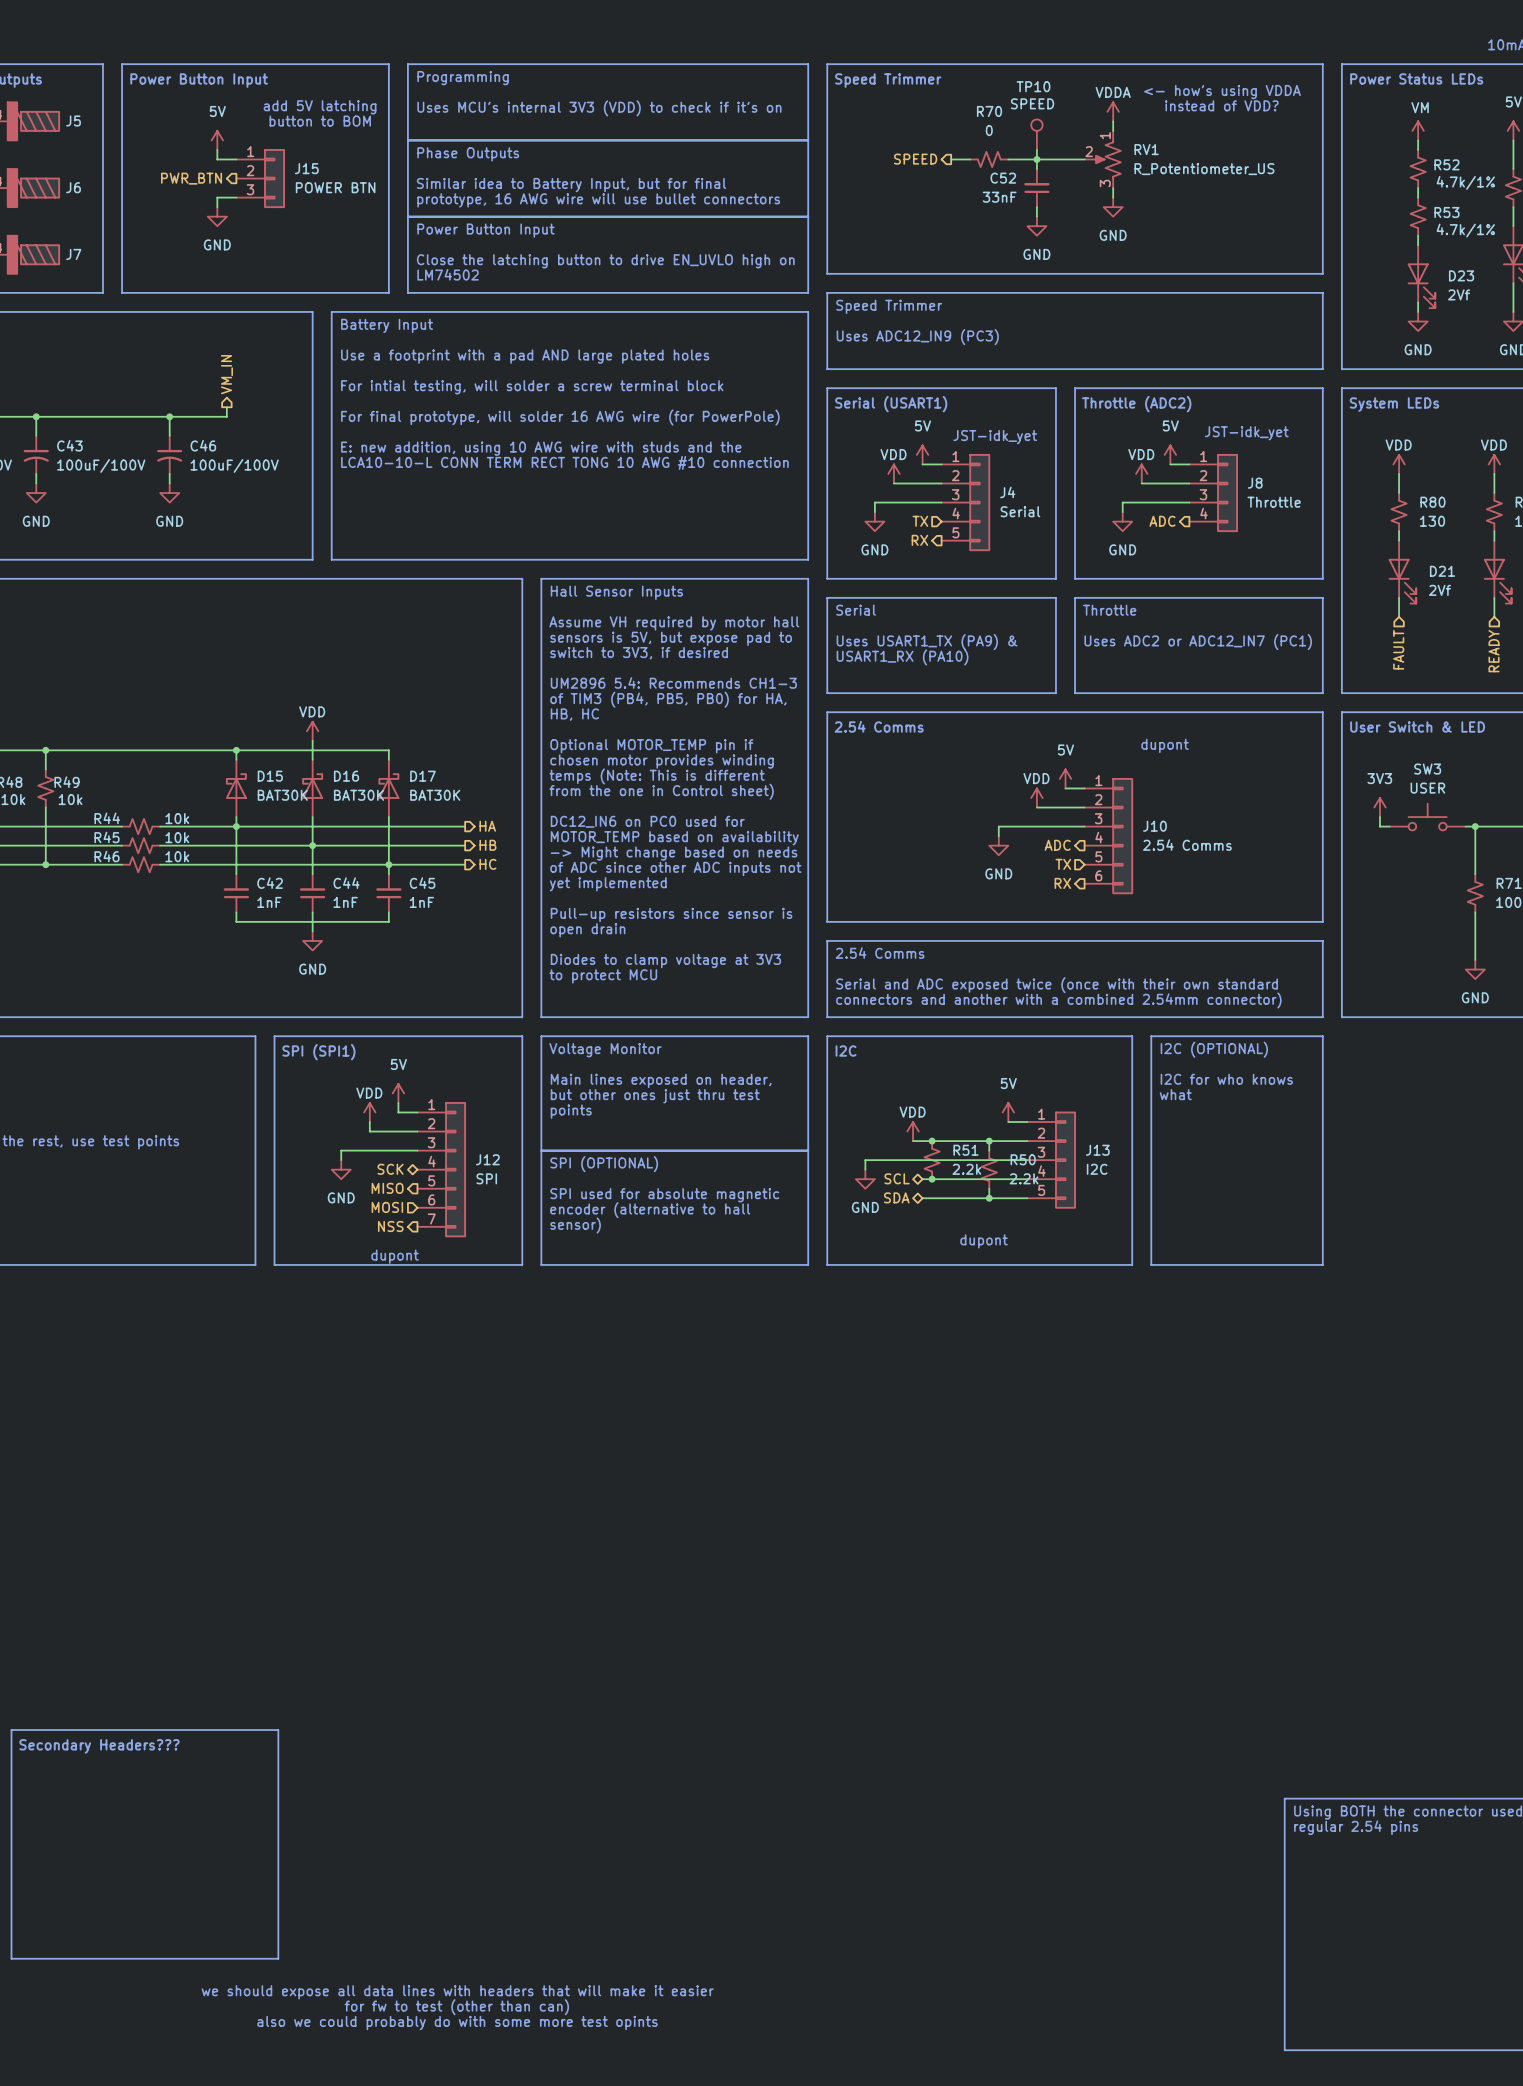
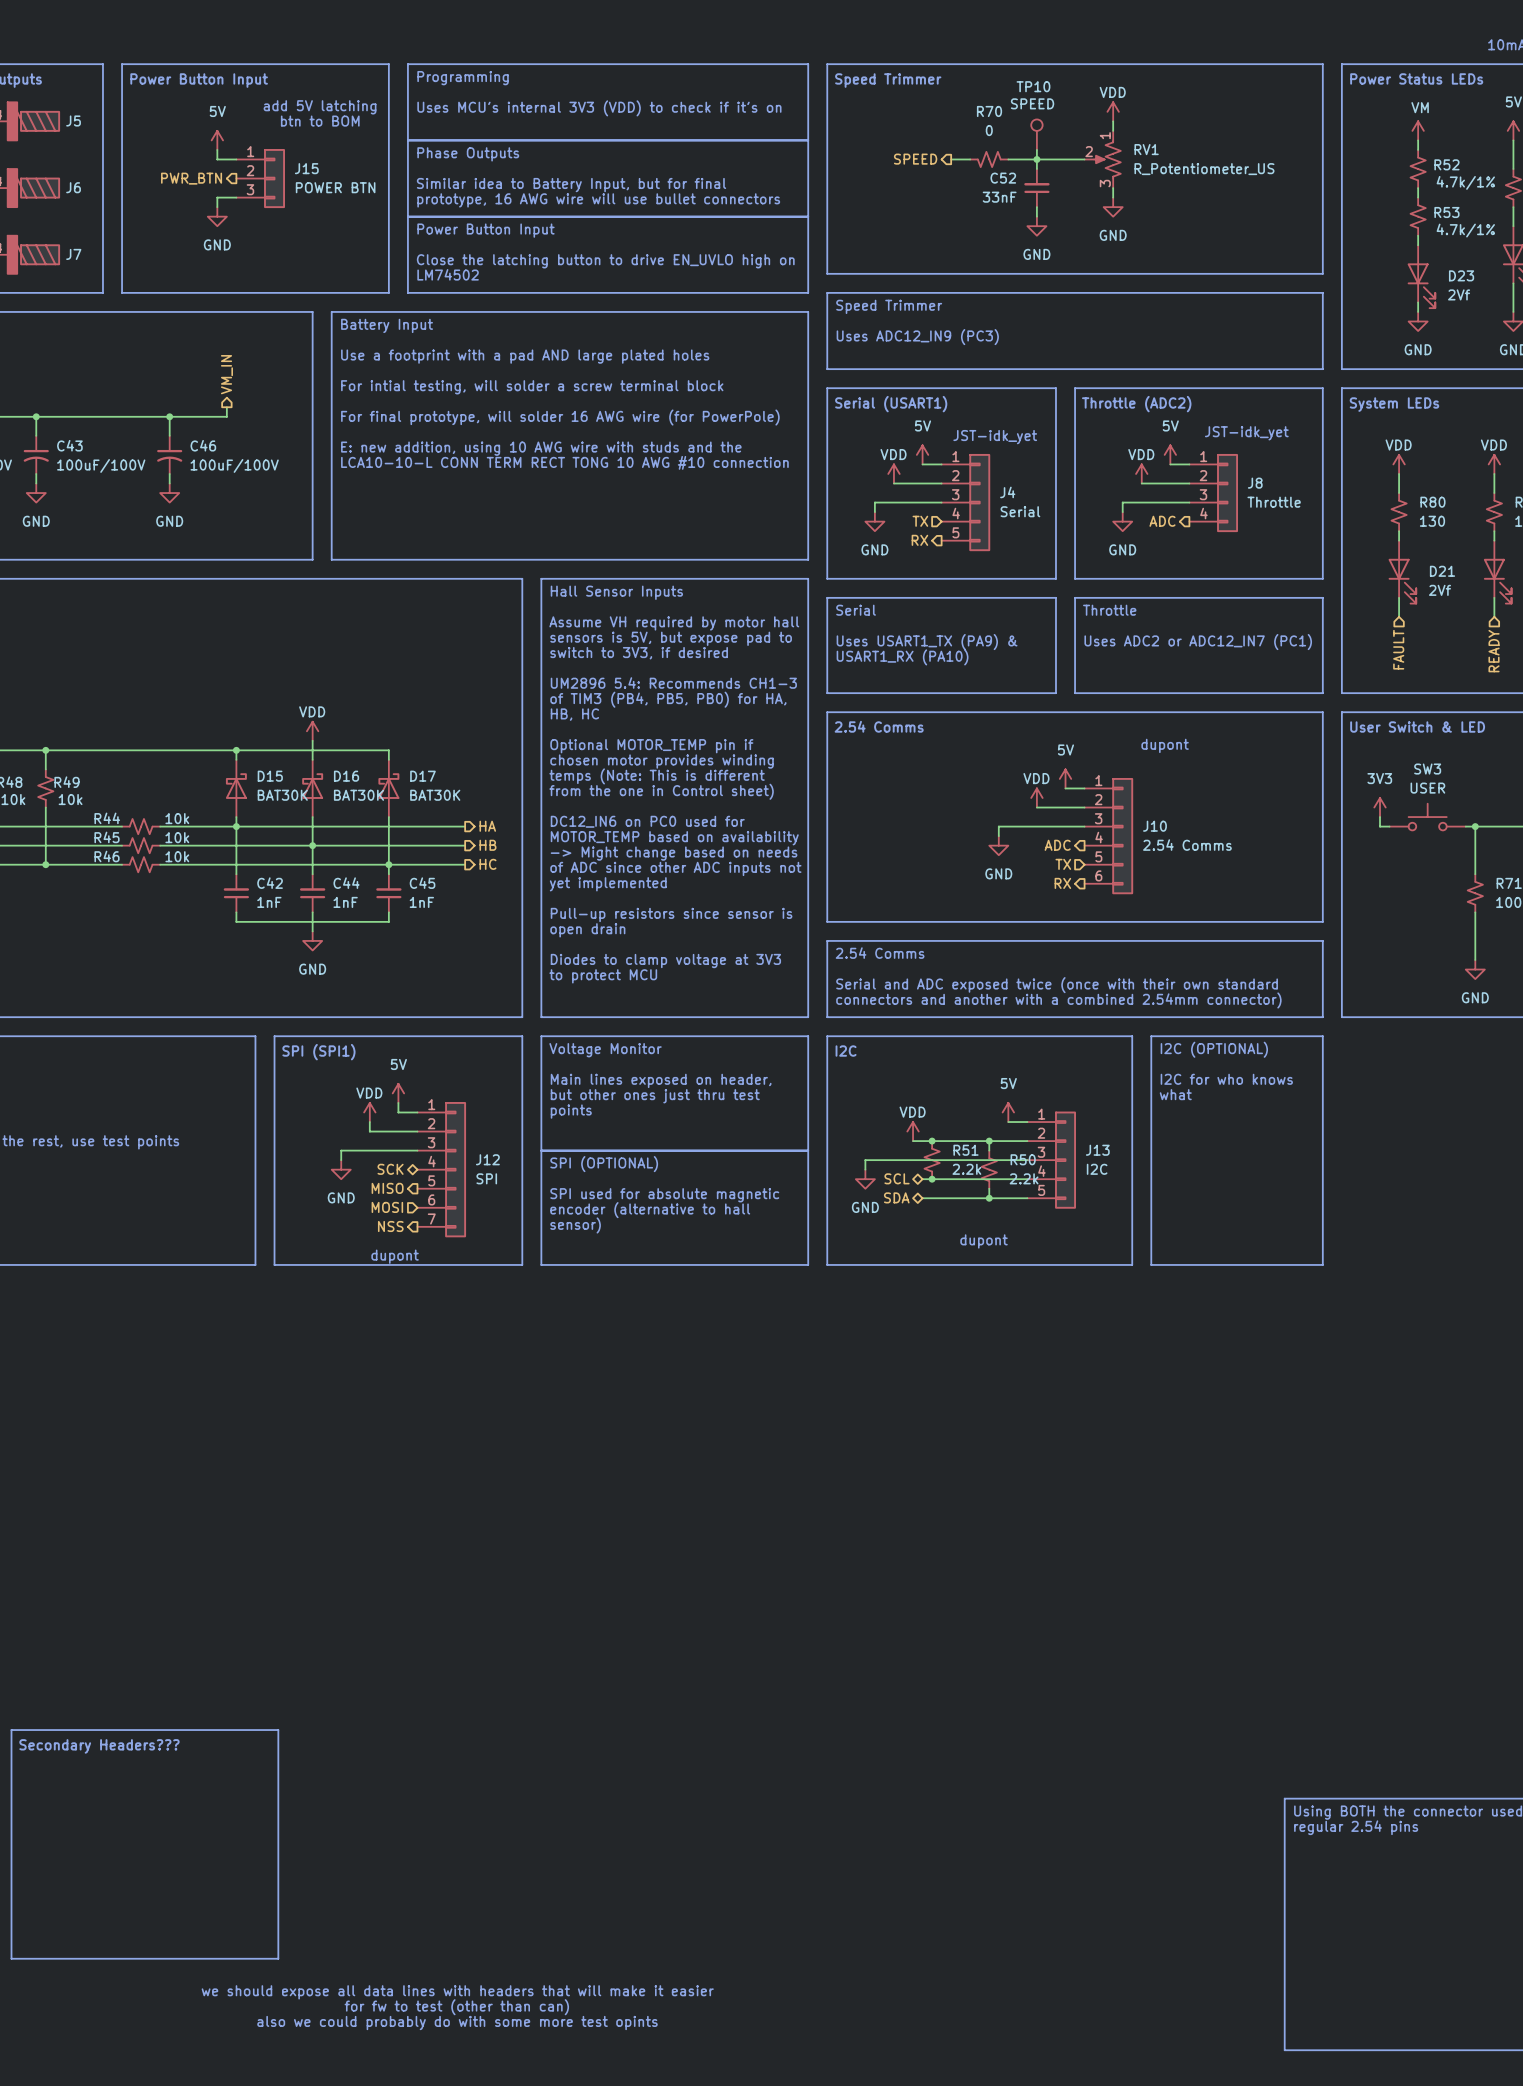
text: <- how's using VDDA (1222, 92) -> none
text: instead of VDD? (1221, 105) -> none
power symbol: VDDA (1113, 111) -> VDD (1113, 111)
text: button to BOM (320, 121) -> btn to BOM (320, 121)

